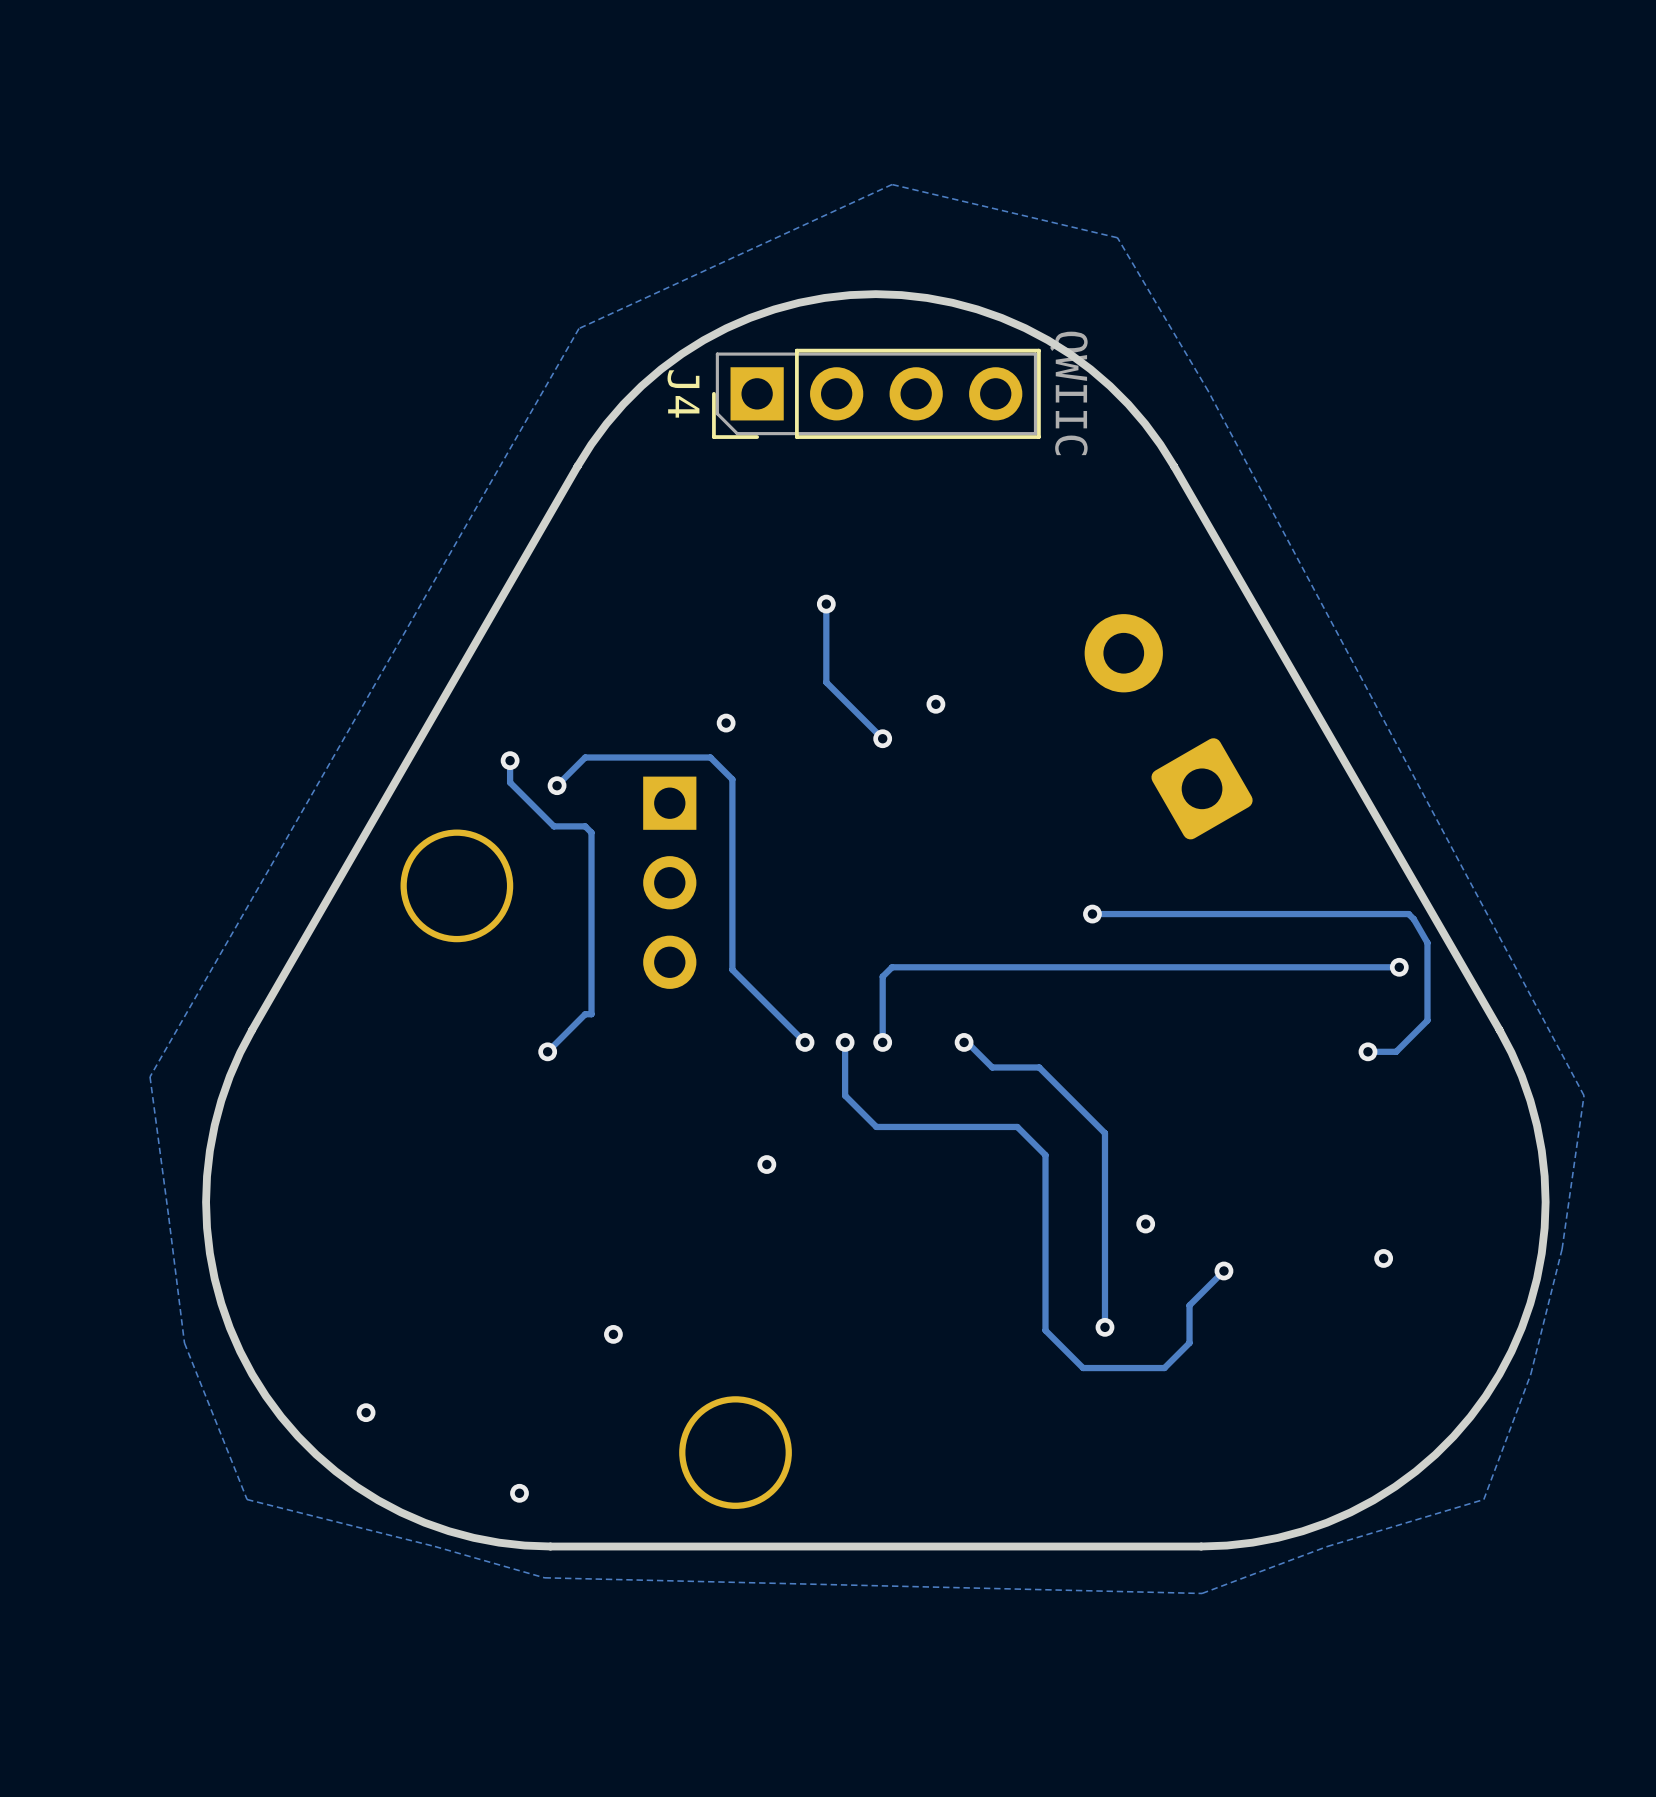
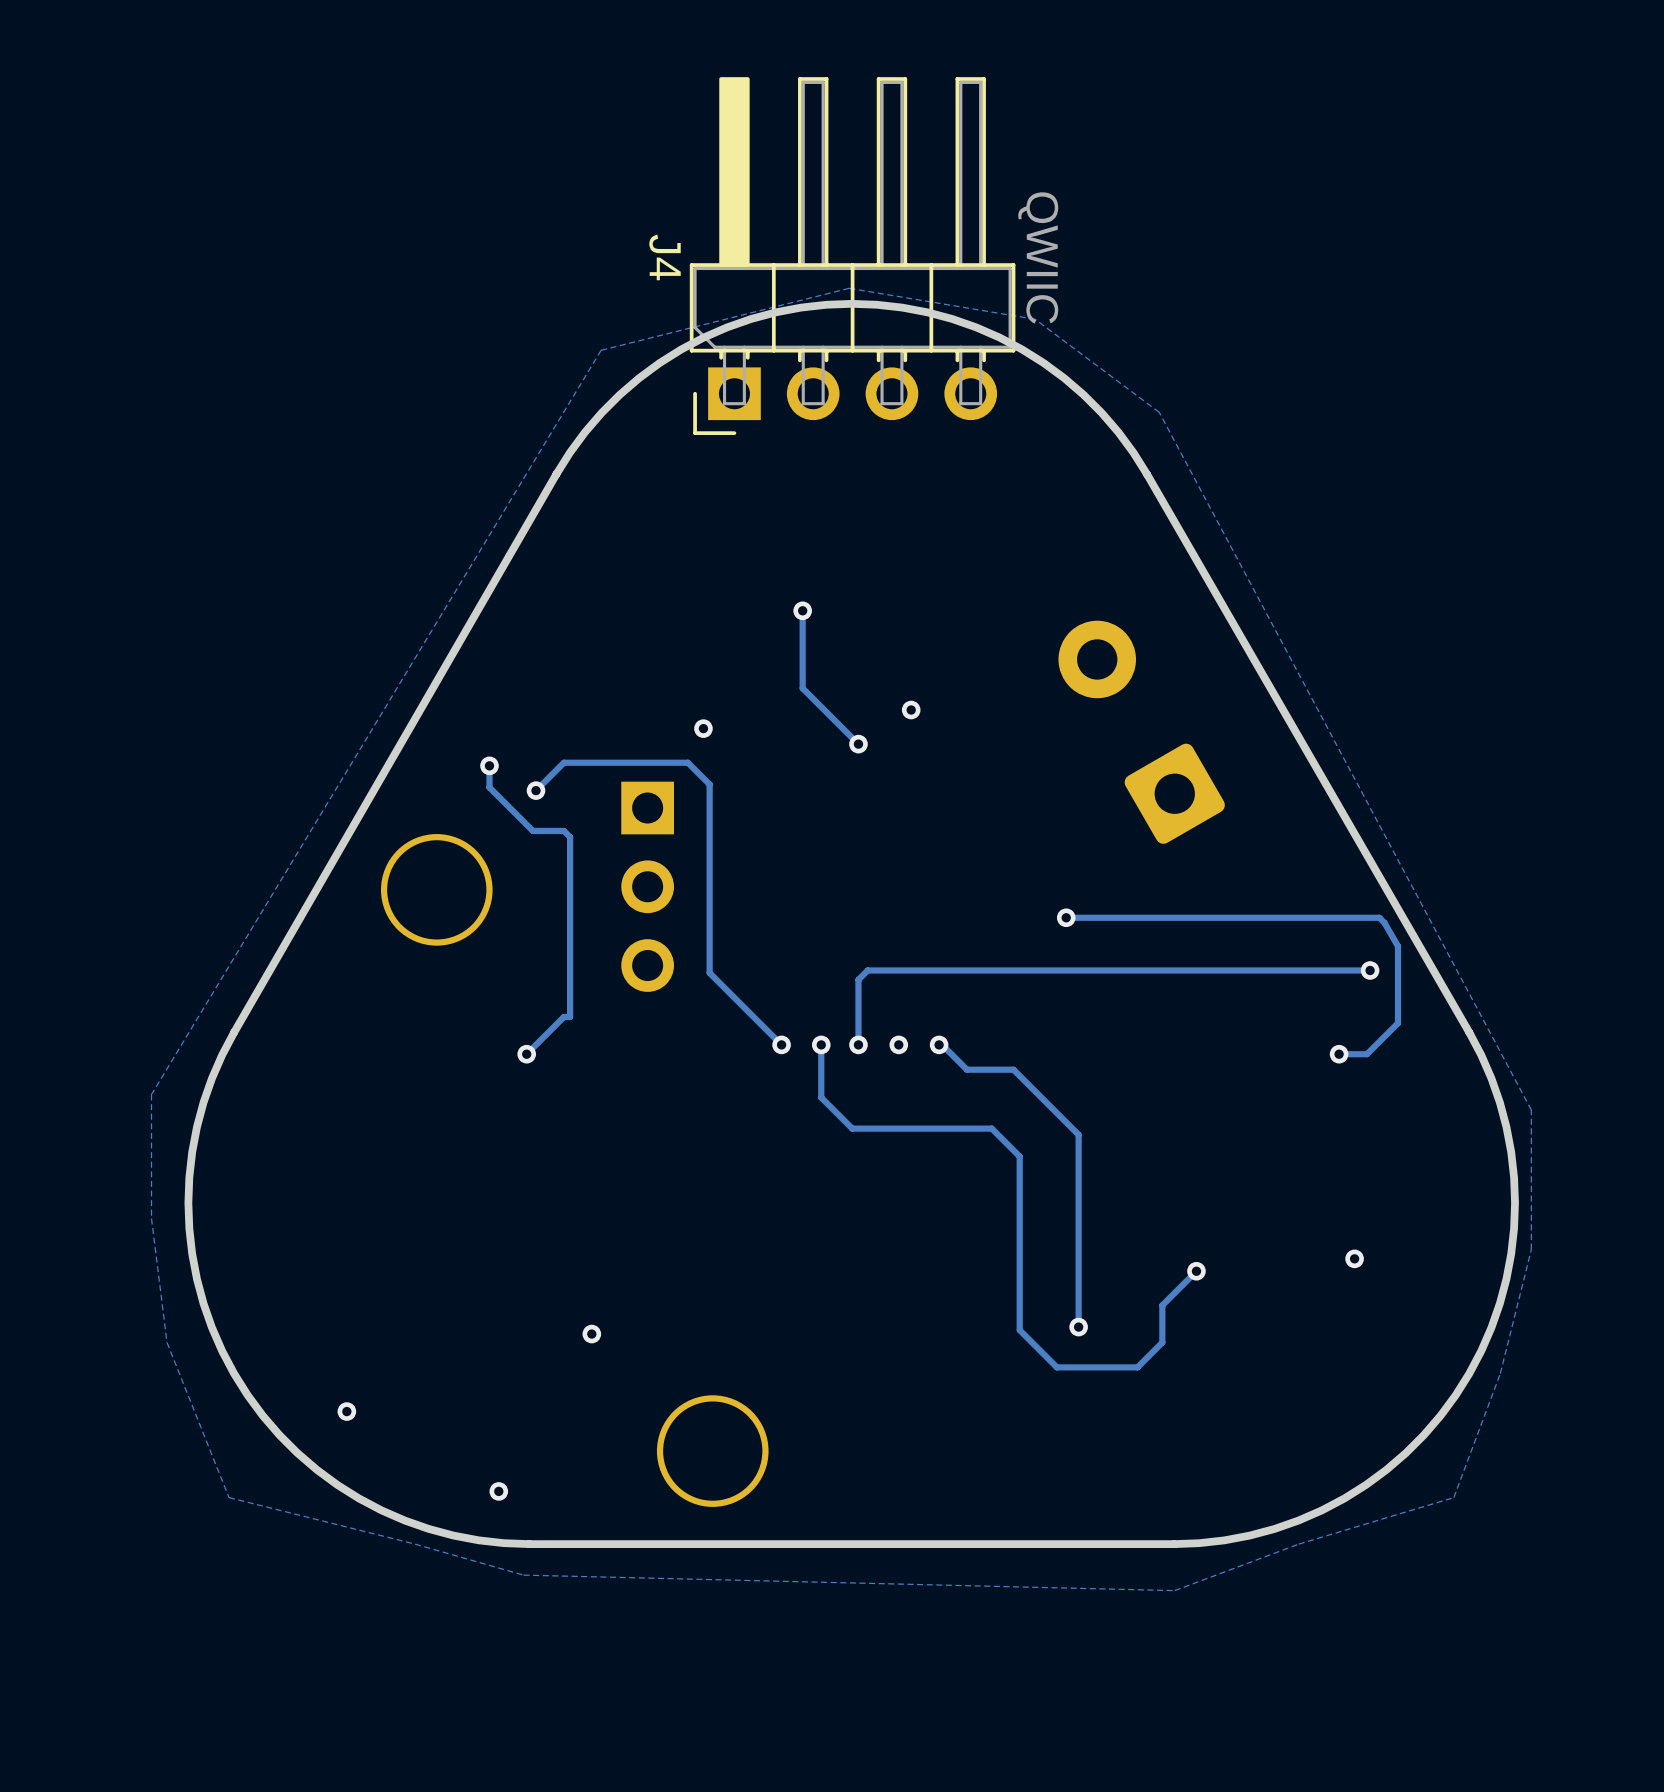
J4 footprint: [712, 348, 1041, 439] -> [689, 77, 1016, 435]
via: none -> (898, 1044)
via: (766, 1164) -> none
zone outline: (168, 1217) (150, 1076) (578, 328) (892, 184) (1117, 237) (1208, 391) (1584, 1095) (1562, 1249) -> (151, 1218) (151, 1094) (601, 350) (849, 288) (1035, 319) (1159, 412) (1531, 1110) (1531, 1249)
via: (1145, 1224) -> none

